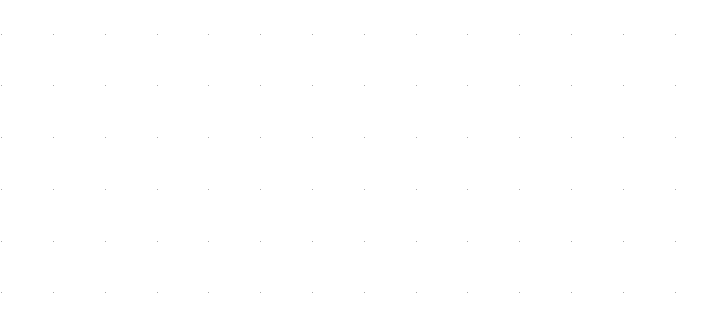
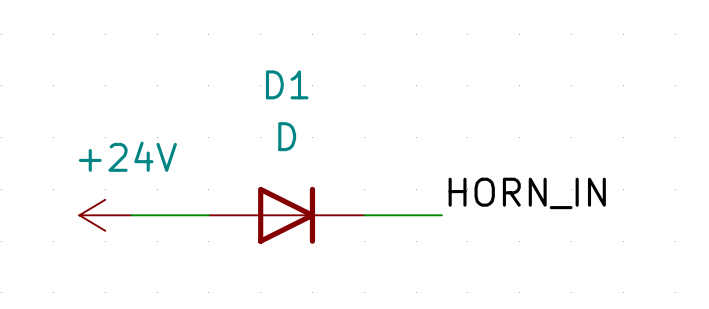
label: none -> HORN_IN (527, 193)
power symbol: none -> +24V (105, 215)
wire: none -> (131, 215) (208, 215)
D1: none -> D (286, 215)
wire: none -> (364, 215) (441, 215)

